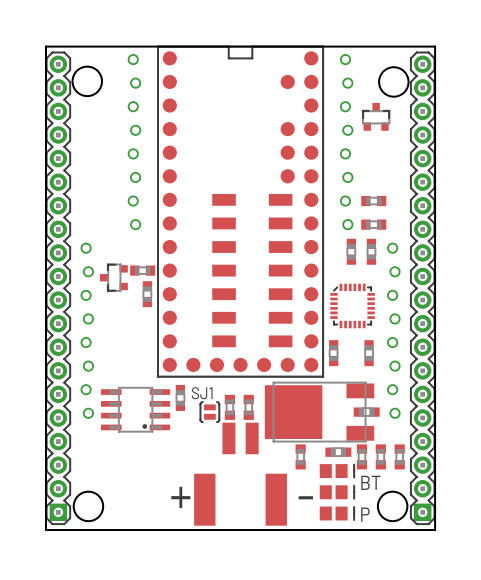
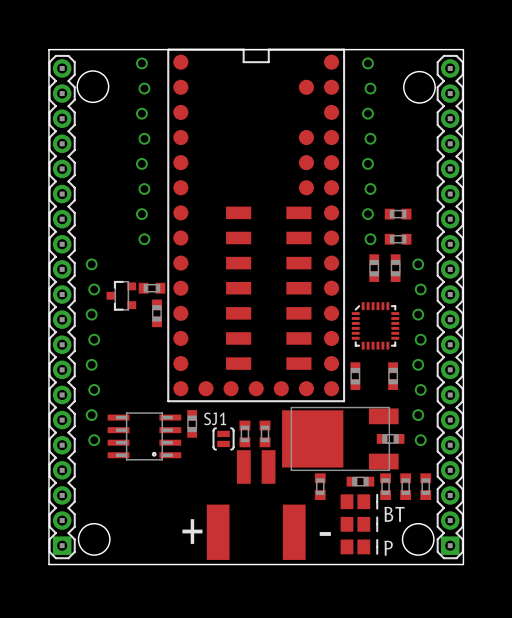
part: (376, 116) -> none

